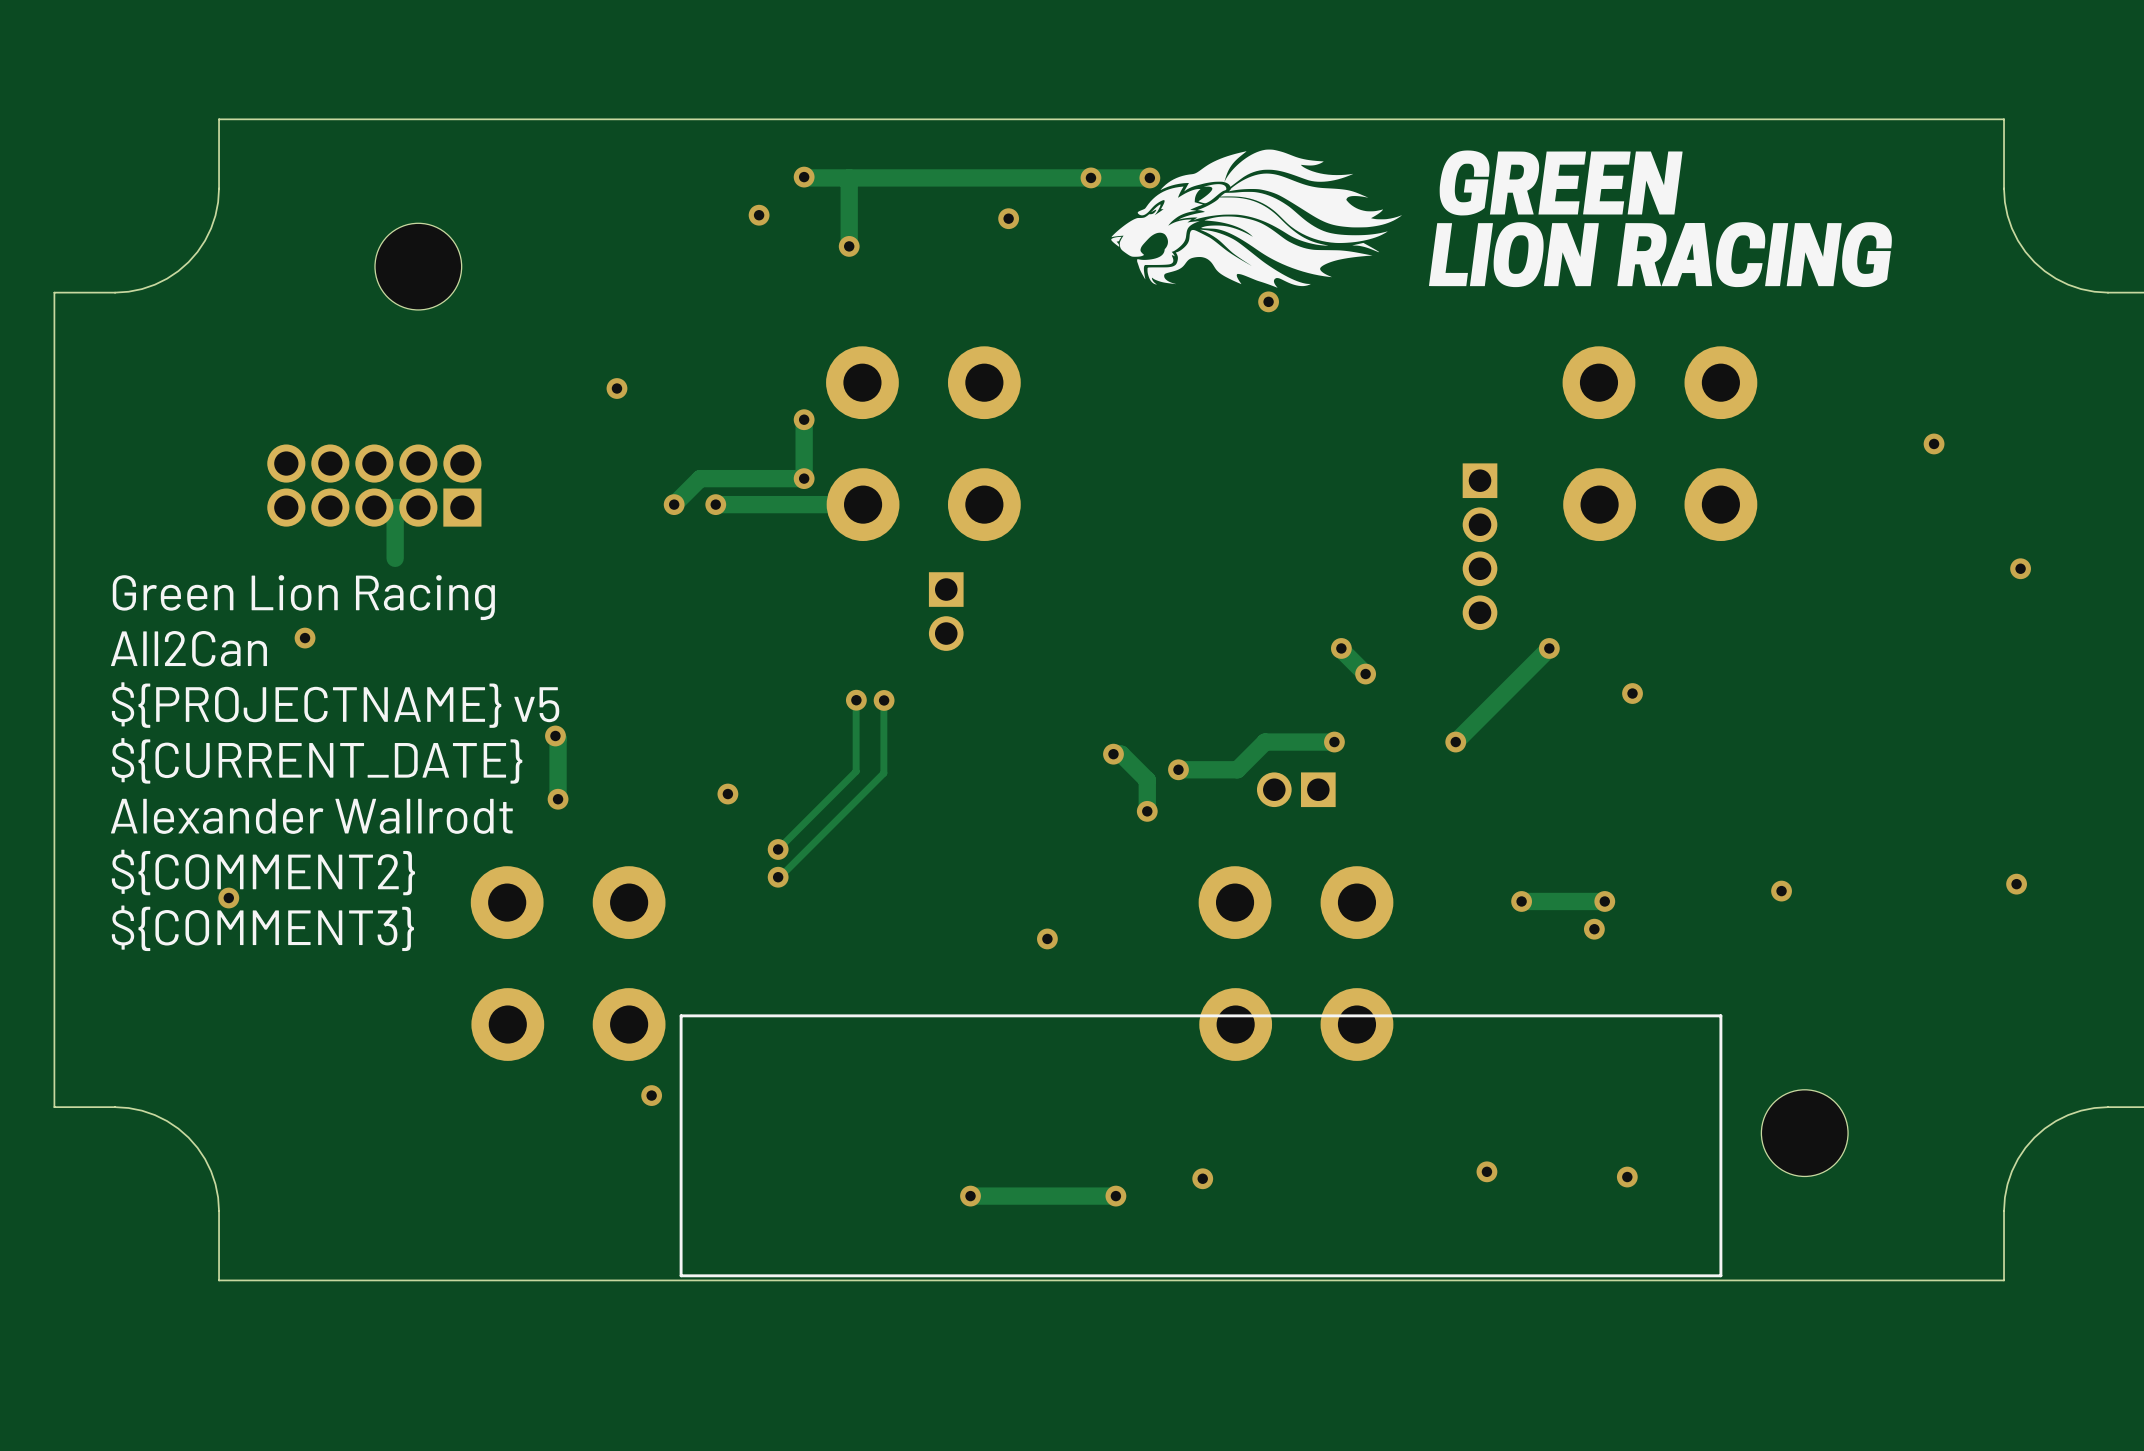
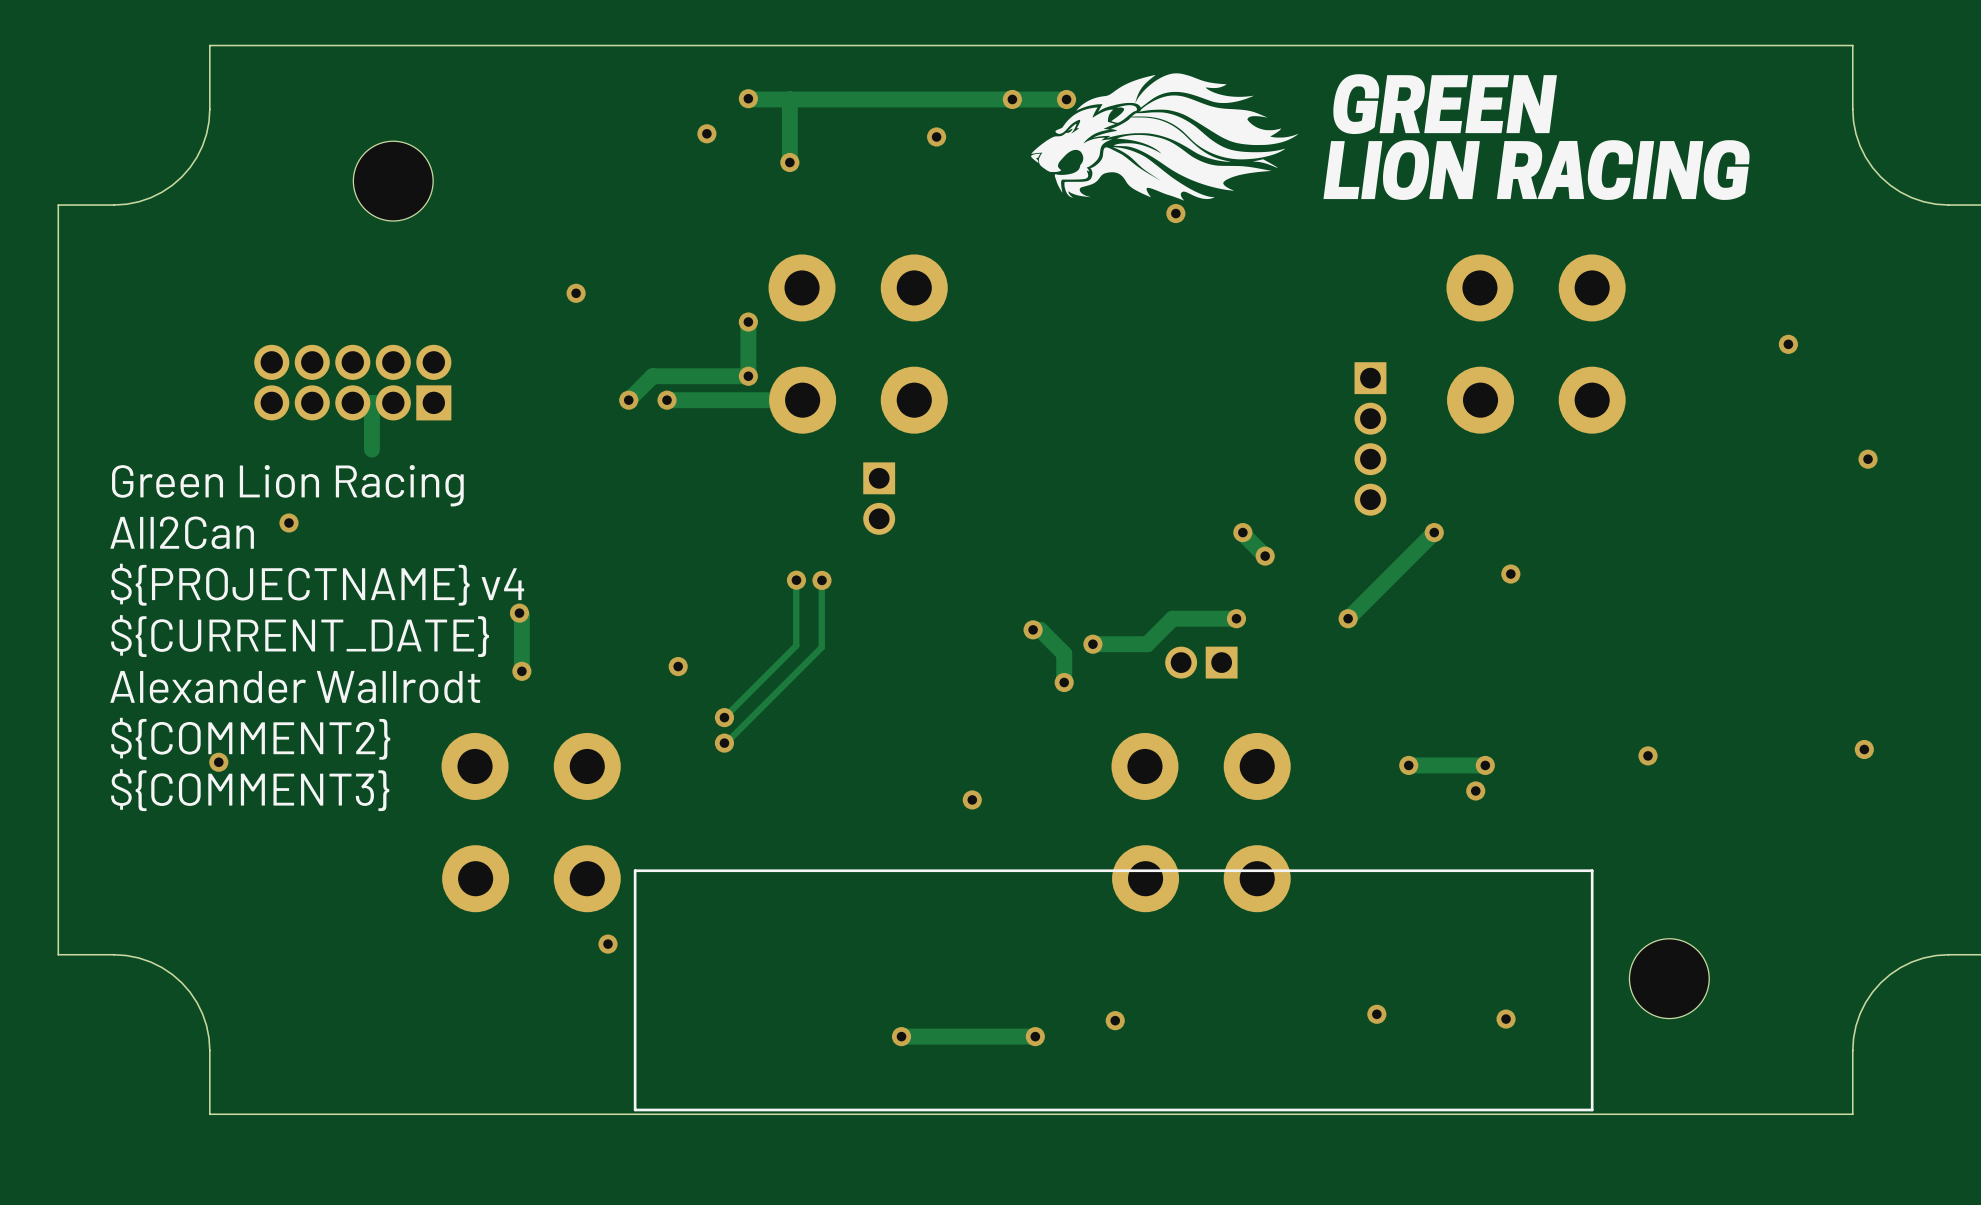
text: ${PROJECTNAME} v5 (335, 705) -> ${PROJECTNAME} v4 (317, 584)

